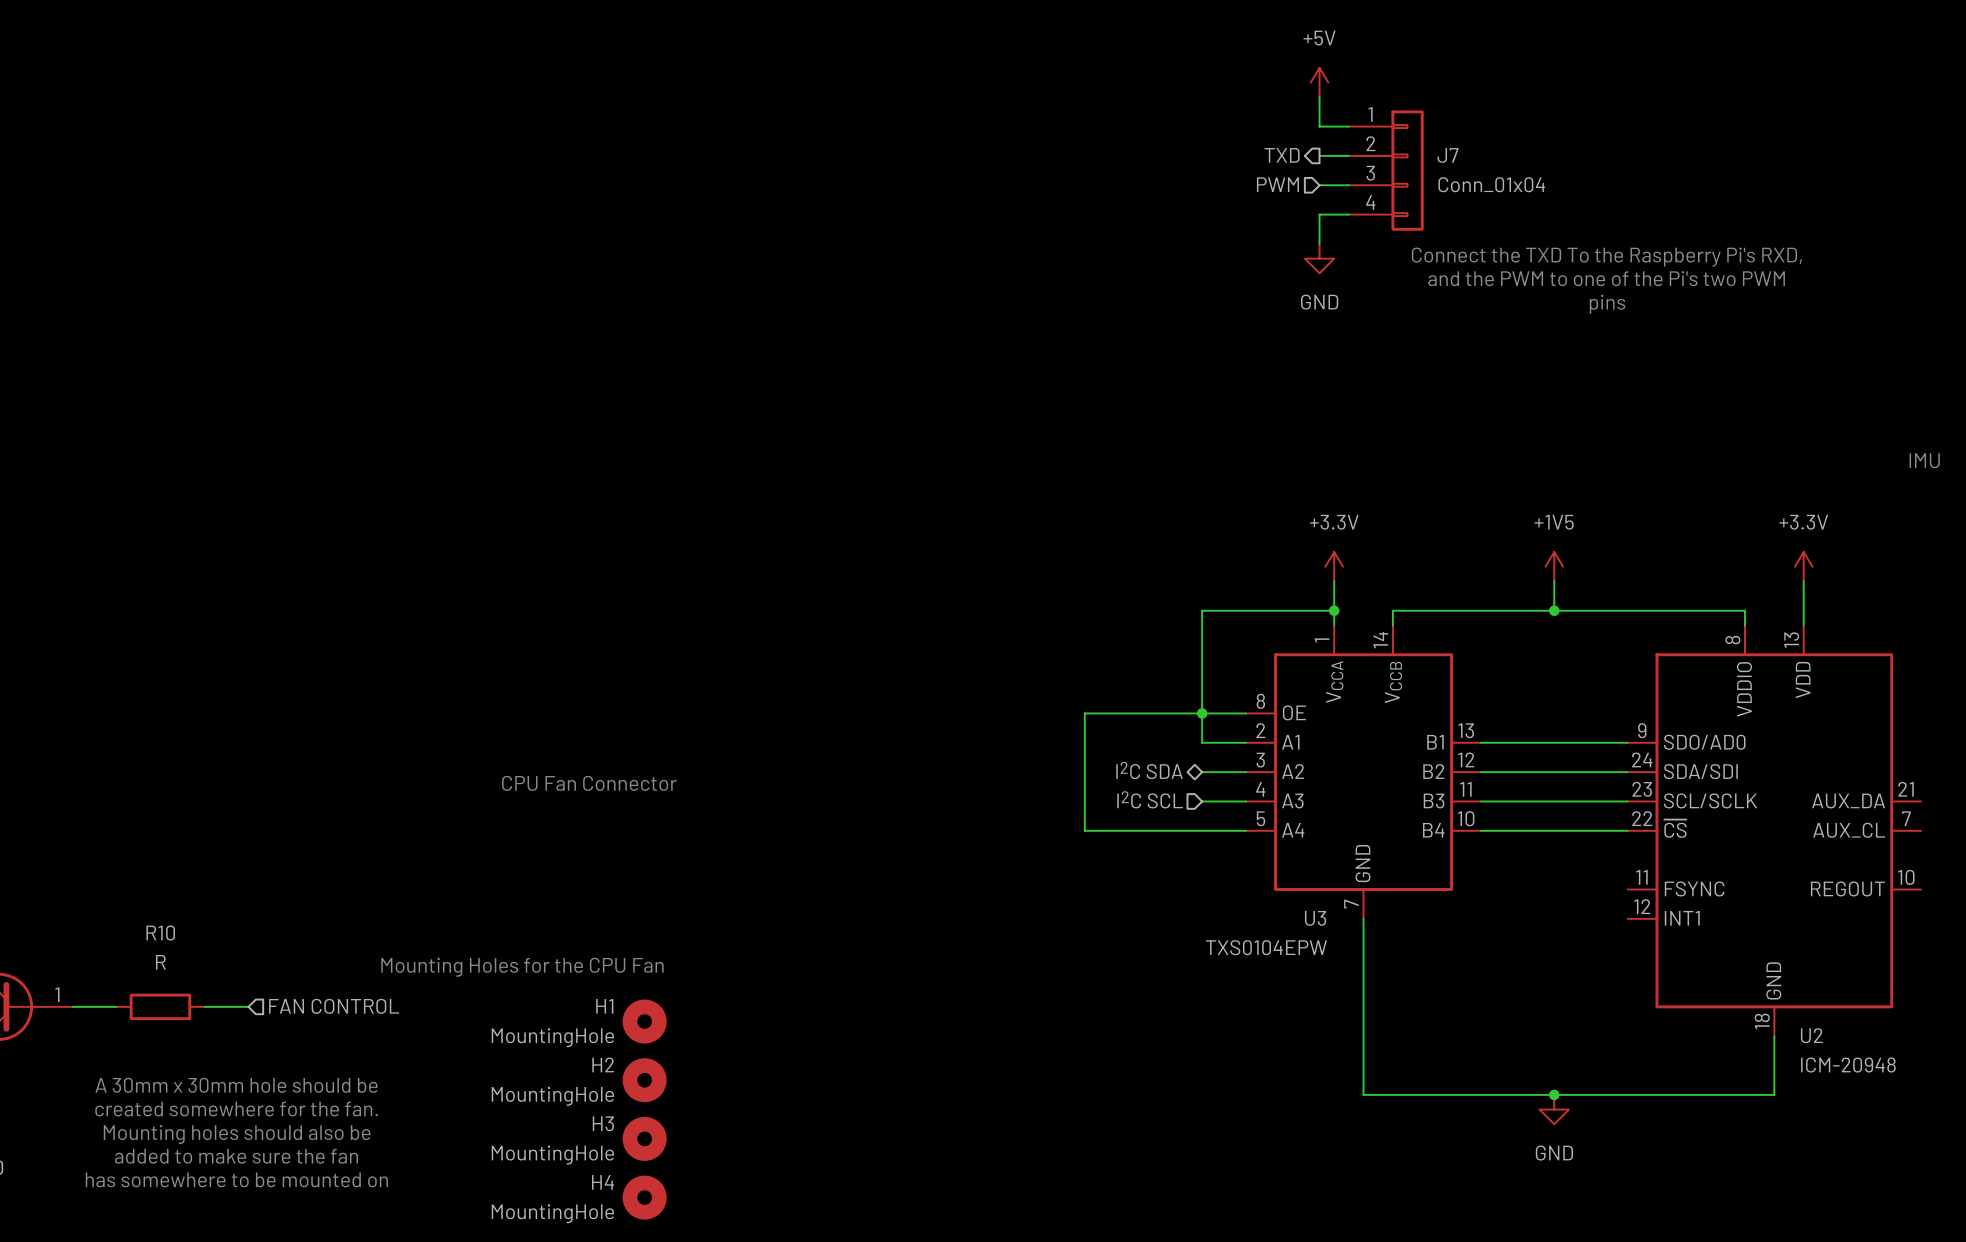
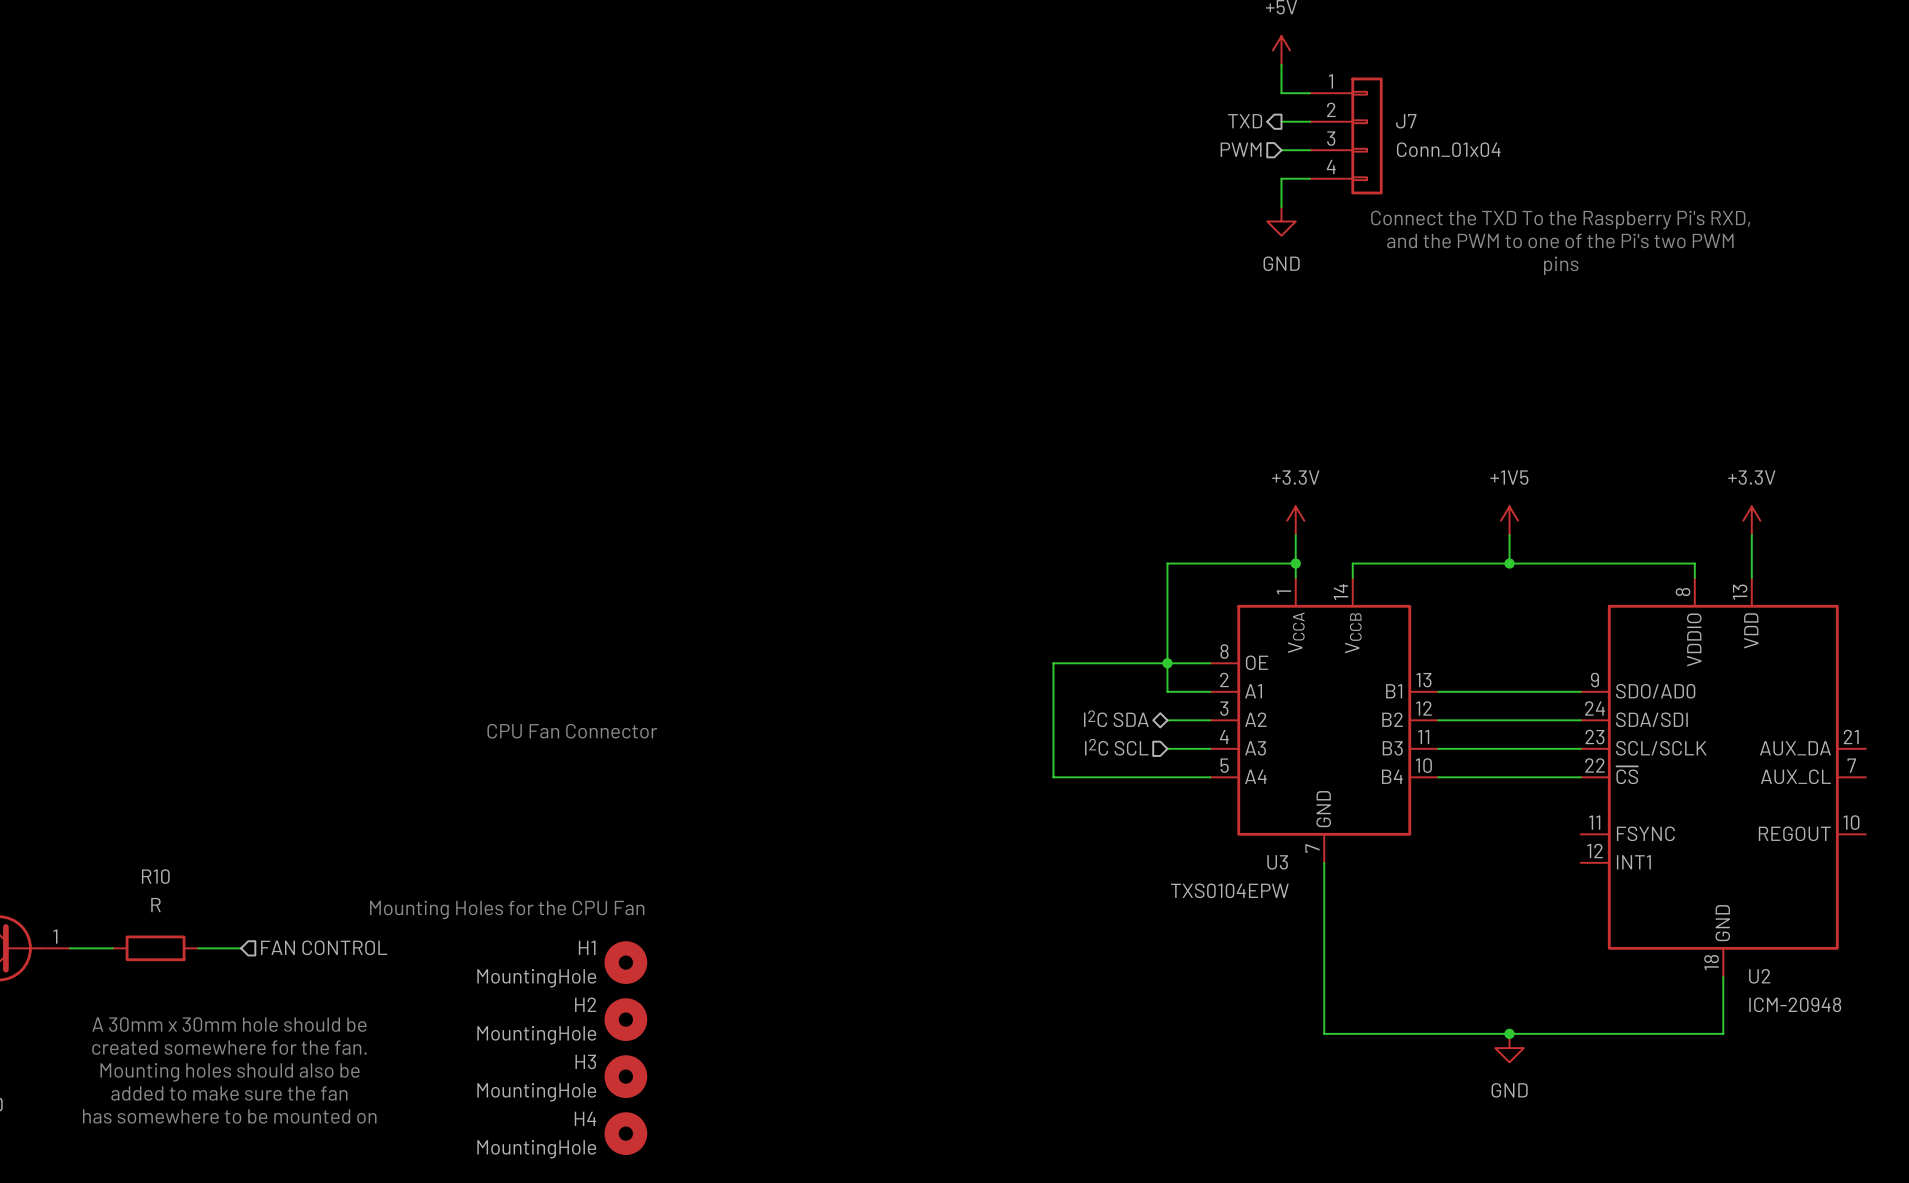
text: IMU (1924, 460) -> none

